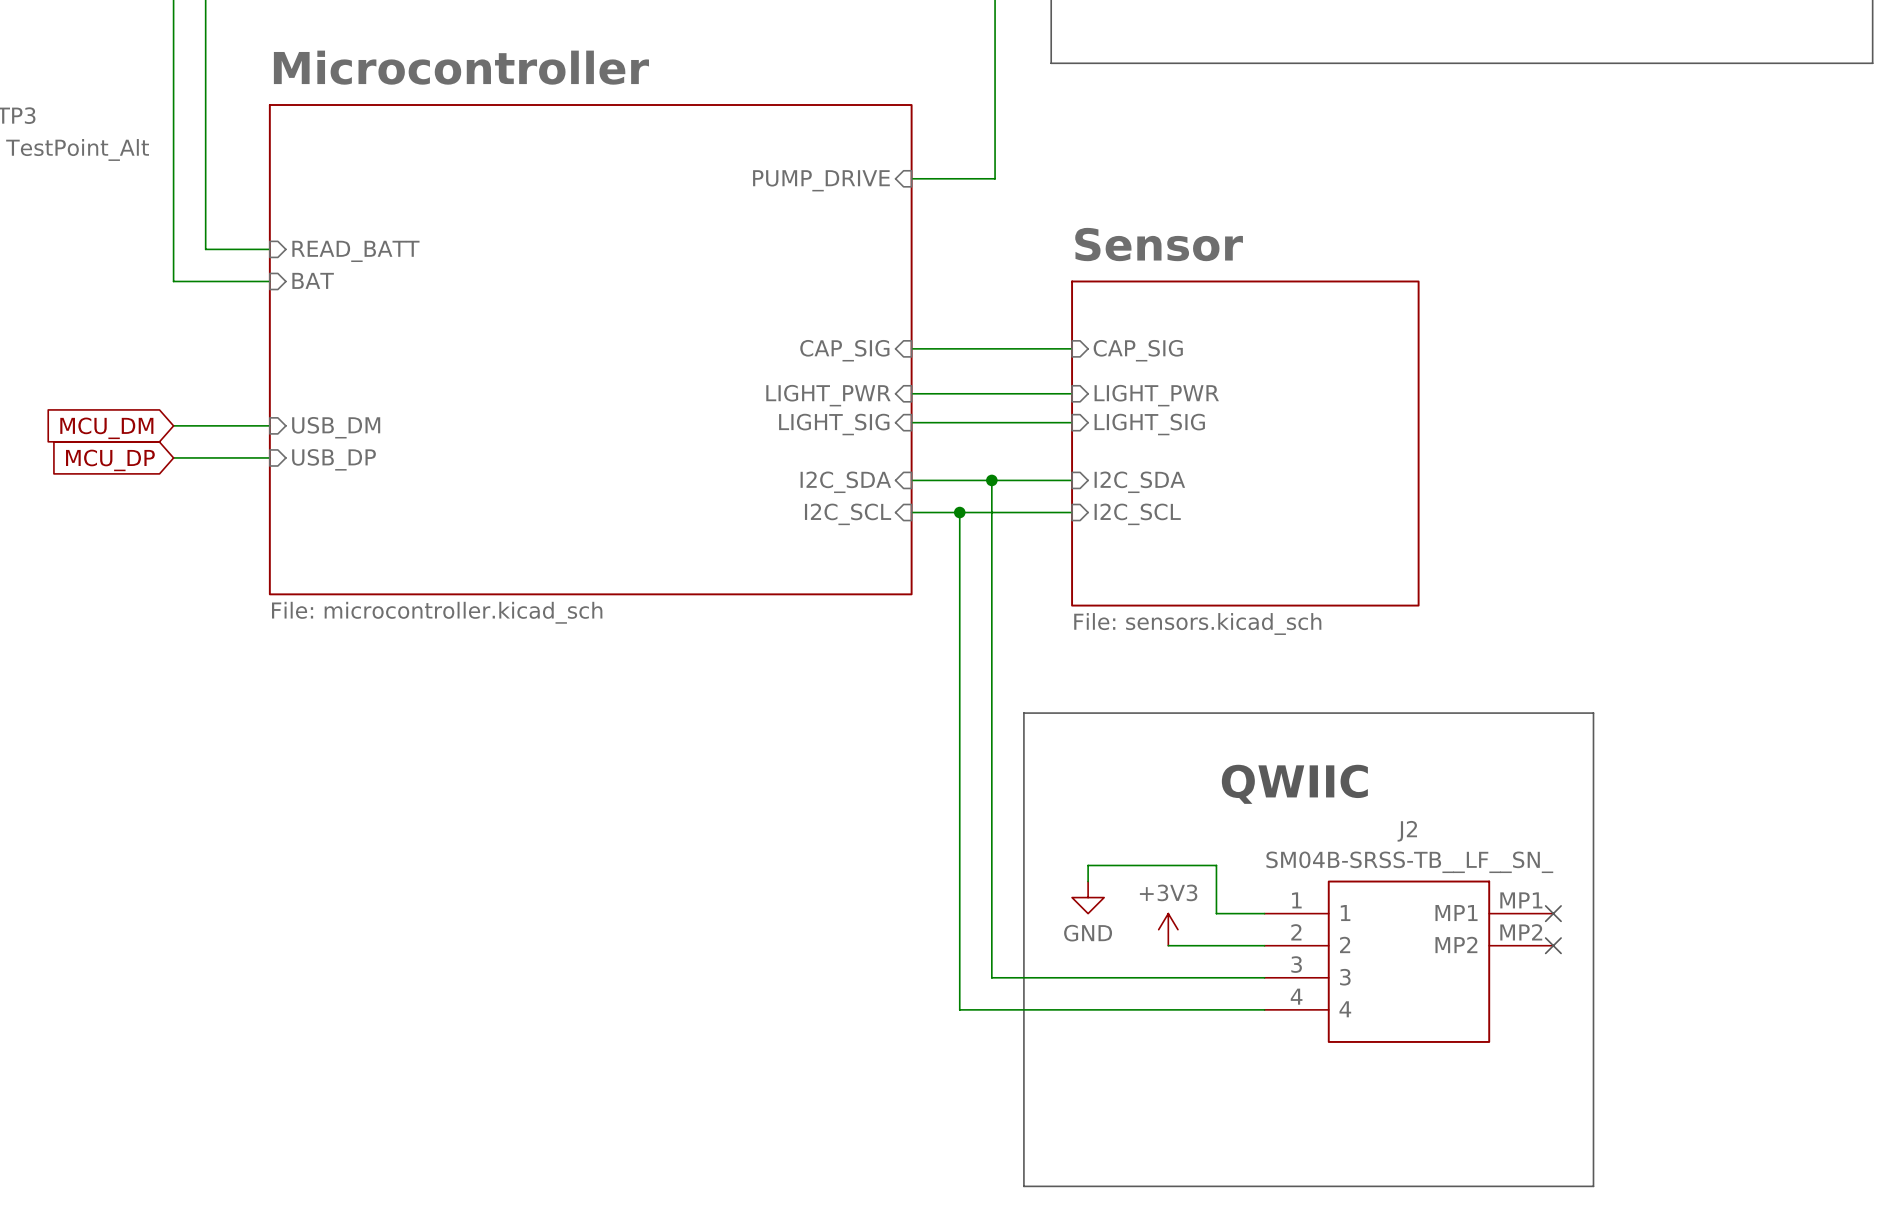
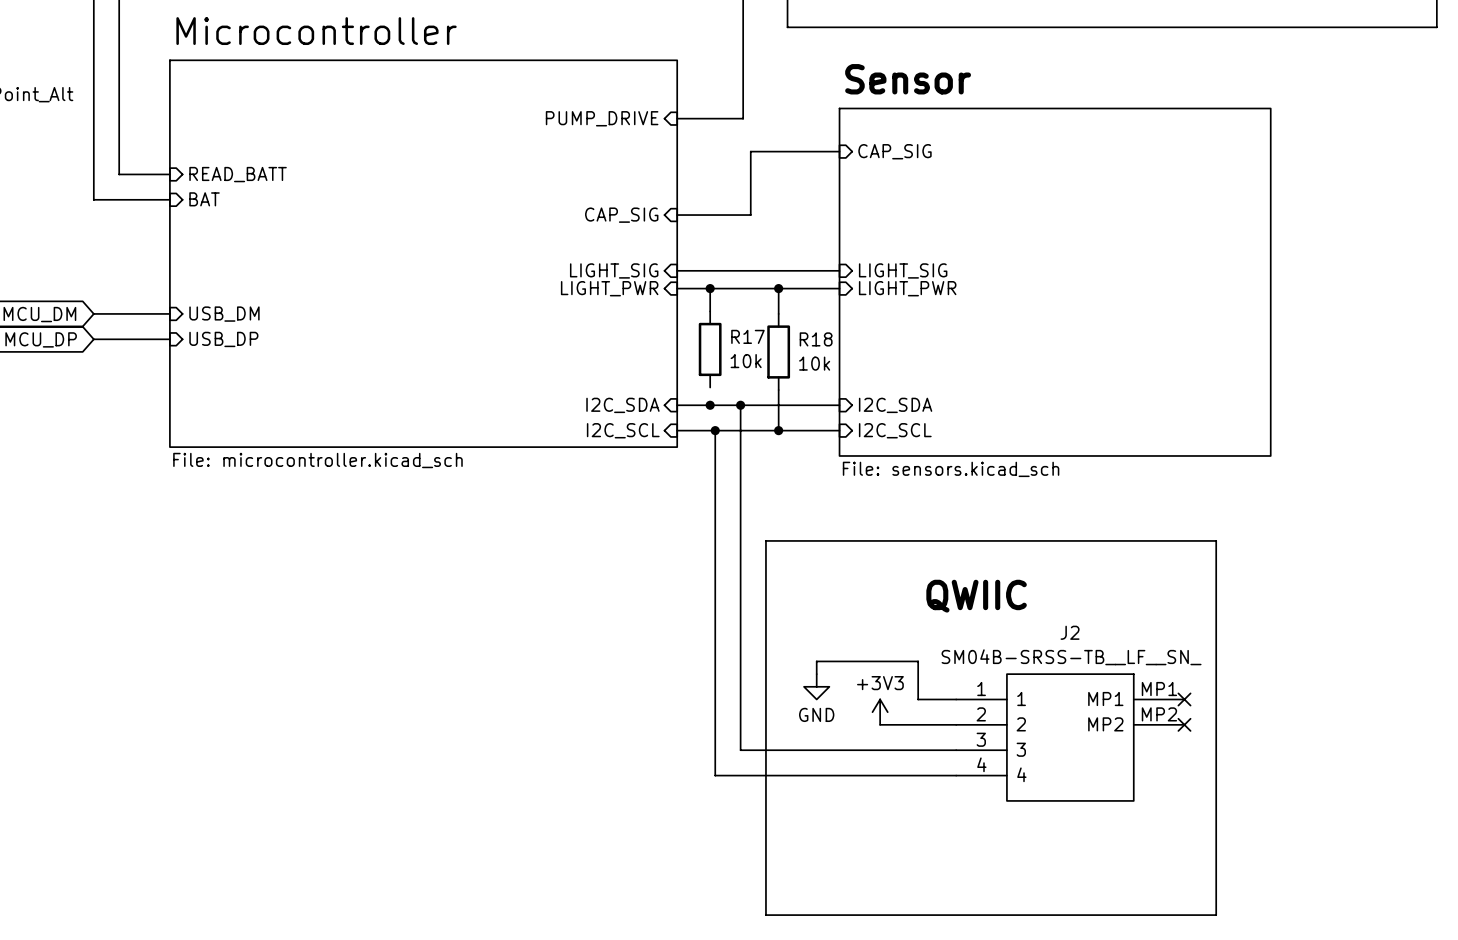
wire: none -> (839, 151) (750, 151) (750, 215) (677, 215)
sheet pin: none -> CAP_SIG (894, 151)
wire: (911, 348) (1072, 348) -> none
sheet pin position: CAP_SIG (844, 350) -> CAP_SIG (621, 215)
sheet pin: CAP_SIG (1138, 350) -> none
wire: none -> (677, 270) (839, 270)
sheet Sensor: none -> File: sensors.kicad_sch (1055, 282)
wire: none -> (710, 288) (710, 311)
junction: none -> (710, 288)
wire: none -> (778, 288) (778, 313)
junction: none -> (778, 288)
wire: none -> (804, 288) (839, 288)
sheet pin position: LIGHT_PWR (1156, 395) -> LIGHT_PWR (907, 288)
wire: (911, 422) (1072, 422) -> none
sheet pin position: LIGHT_SIG (834, 424) -> LIGHT_SIG (614, 270)
sheet pin position: LIGHT_SIG (1149, 424) -> LIGHT_SIG (903, 270)
sheet Sensor: File: sensors.kicad_sch (1245, 443) -> none
R17: none -> 10k (710, 349)
R18: none -> 10k (778, 351)
wire: (911, 480) (1072, 480) -> none
wire: (991, 480) (991, 541) -> none
junction: (991, 480) -> none
sheet pin position: I2C_SDA (845, 482) -> I2C_SDA (622, 405)
sheet pin position: I2C_SDA (1139, 482) -> I2C_SDA (895, 405)
wire: (911, 512) (1072, 512) -> none
wire: (959, 512) (959, 573) -> none
junction: (959, 512) -> none
sheet pin position: I2C_SCL (848, 514) -> I2C_SCL (623, 430)
sheet pin position: I2C_SCL (1137, 514) -> I2C_SCL (895, 430)
wire: none -> (778, 390) (778, 430)
wire: none -> (677, 405) (839, 405)
junction: none -> (710, 405)
junction: none -> (740, 405)
wire: none -> (677, 430) (839, 430)
junction: none -> (715, 430)
junction: none -> (778, 430)

